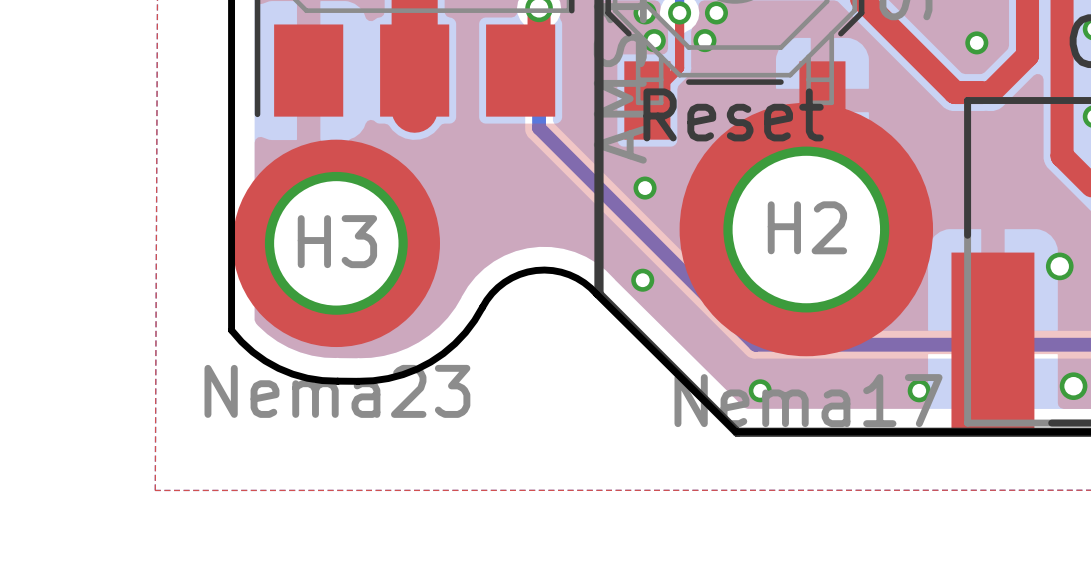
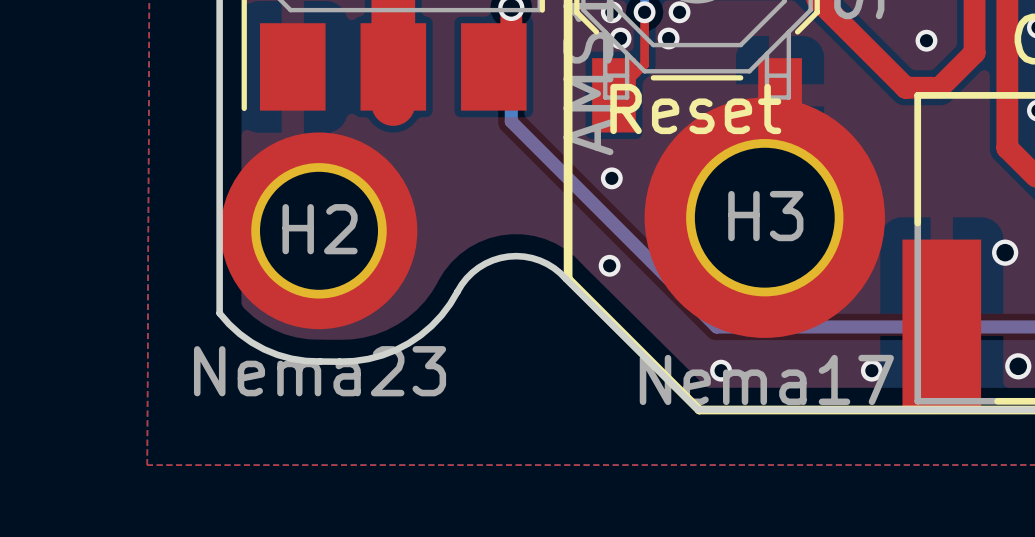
H2 name: H2 (807, 227) -> H3 (765, 216)
H3 name: H3 (337, 241) -> H2 (320, 229)

